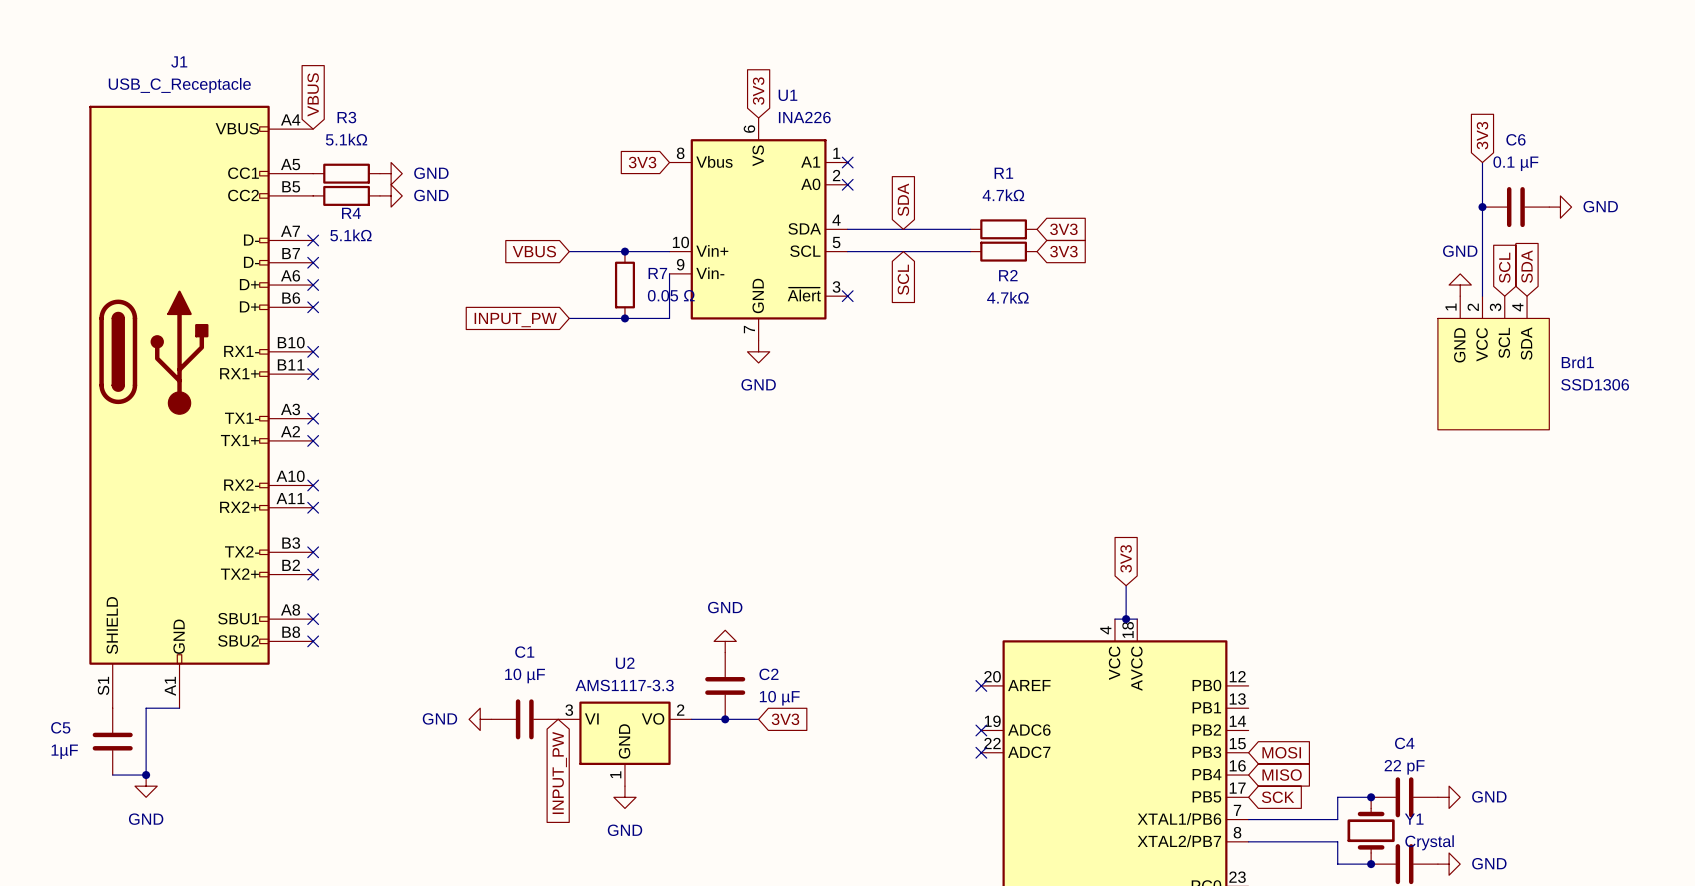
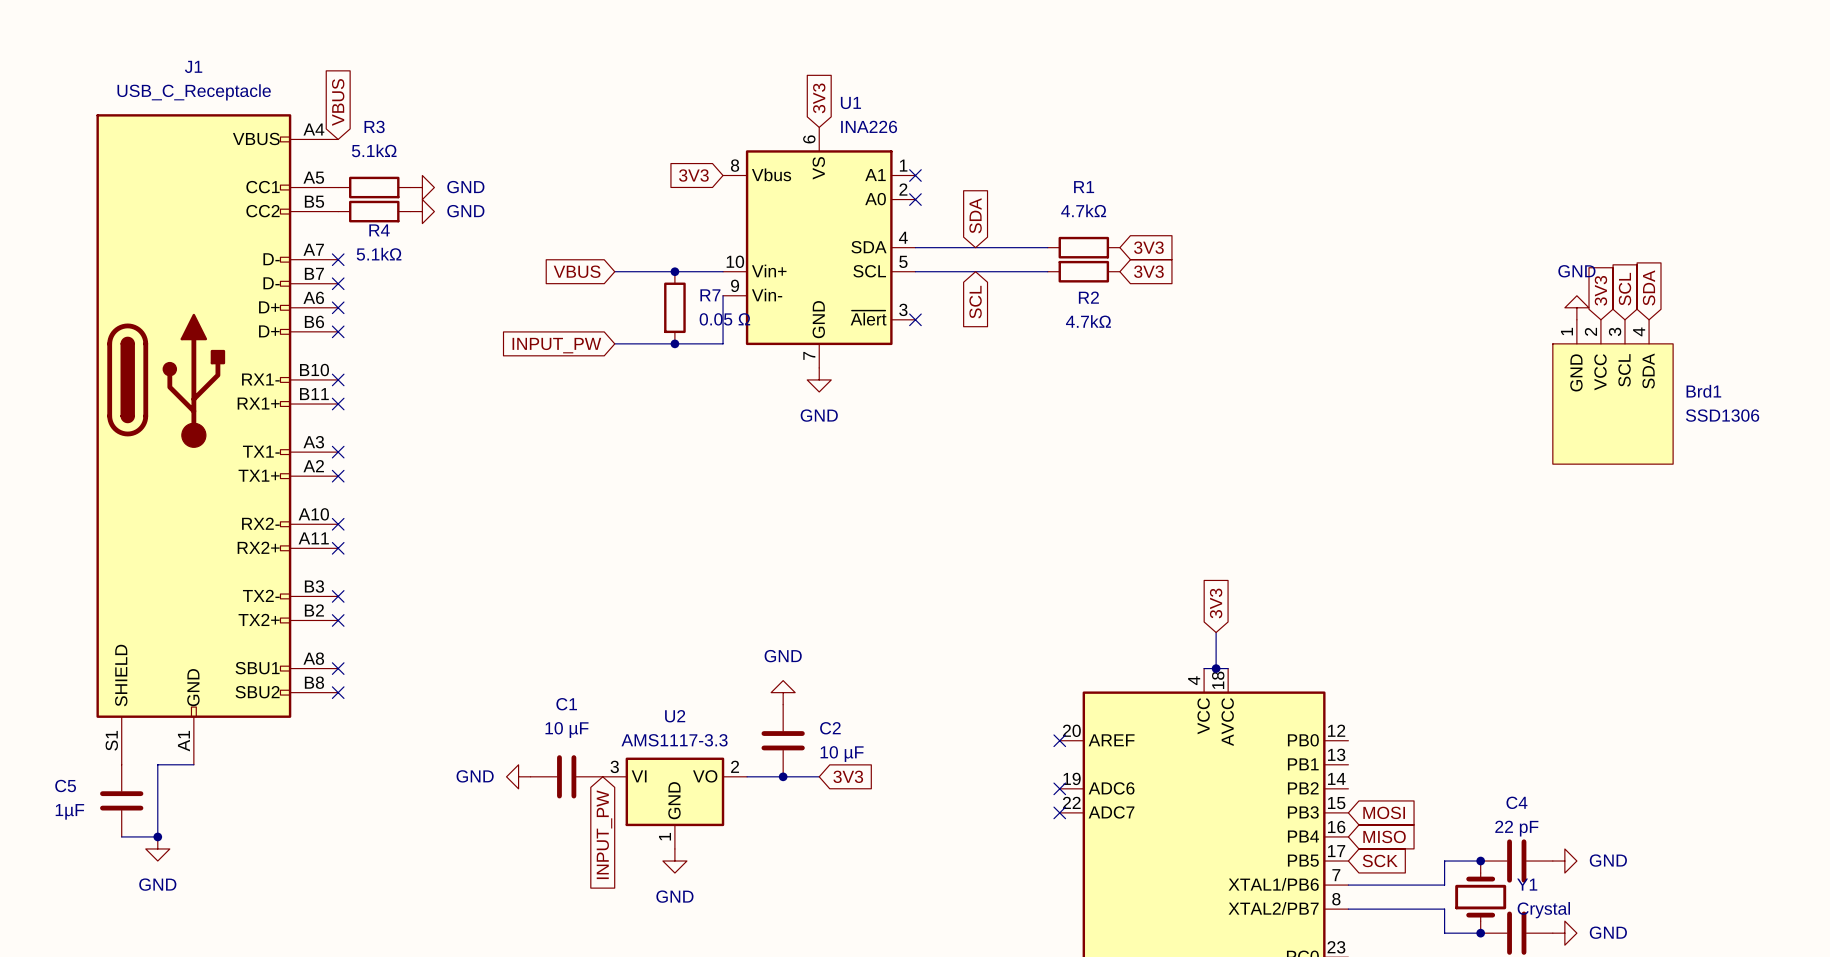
global label position: 3V3 (1482, 135) -> 3V3 (1600, 290)
wire: (1482, 162) (1482, 296) -> none
junction: (1482, 207) -> none
C6: 0.1 µF (1515, 207) -> none
power symbol: GND (1560, 207) -> none

